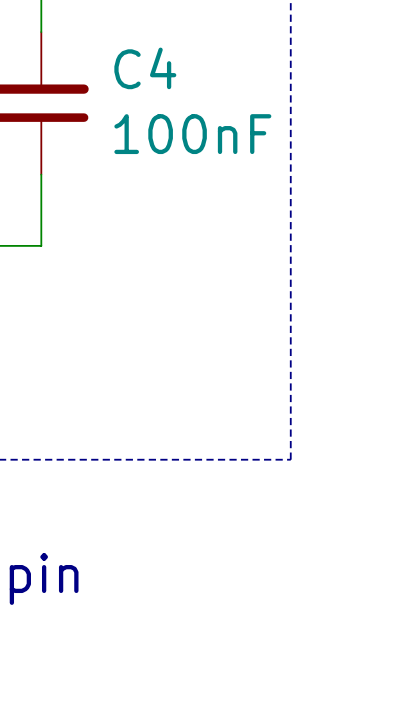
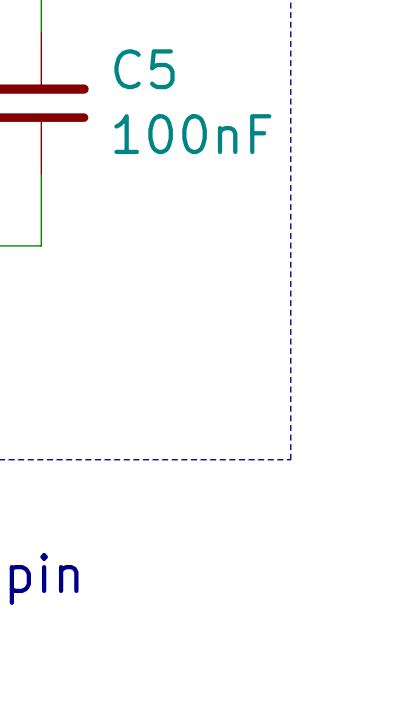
C4 name: C4 (145, 68) -> C5 (144, 69)

